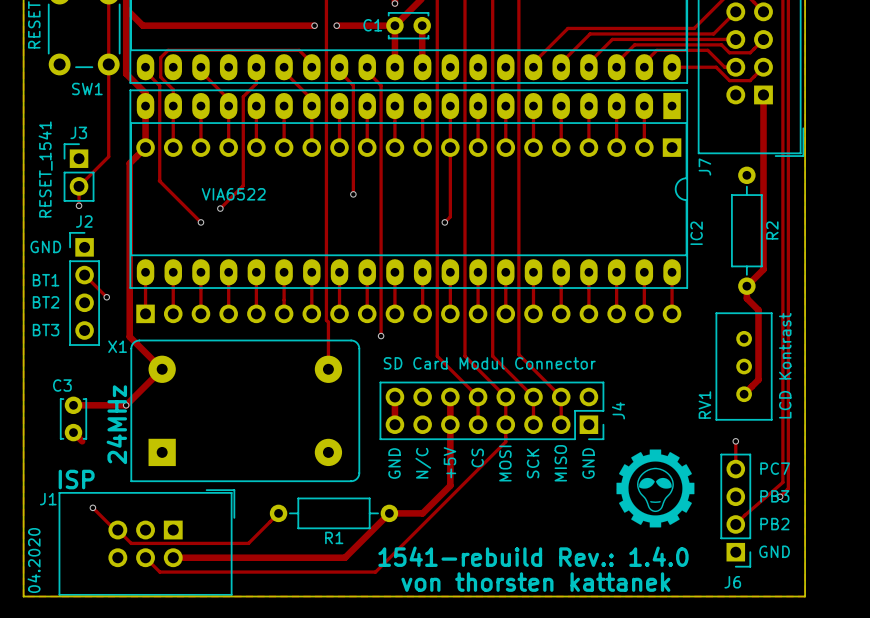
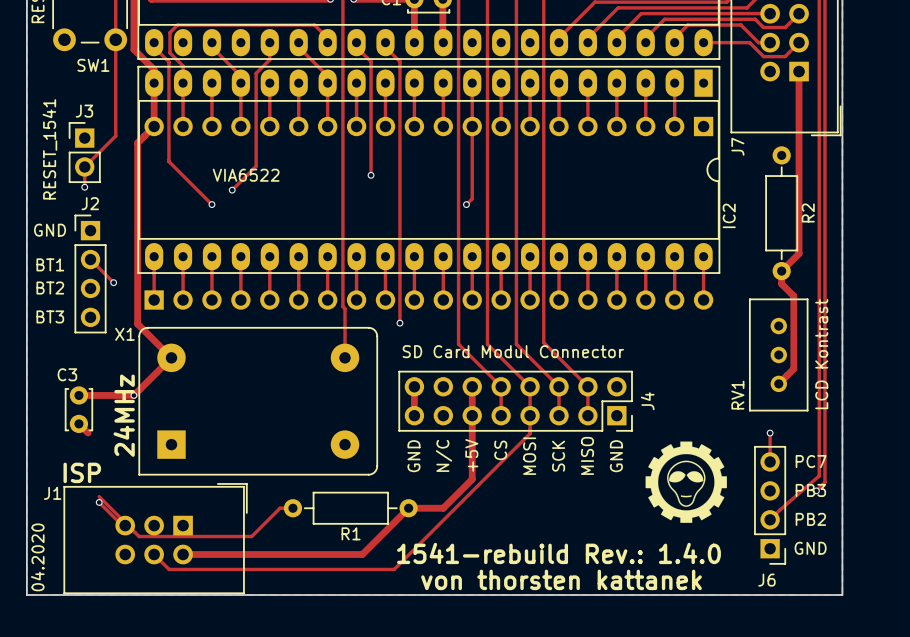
track: (278, 513) (248, 543) (131, 543) (117, 530) -> (292, 508) (280, 508) (251, 536) (139, 536) (99, 496)

